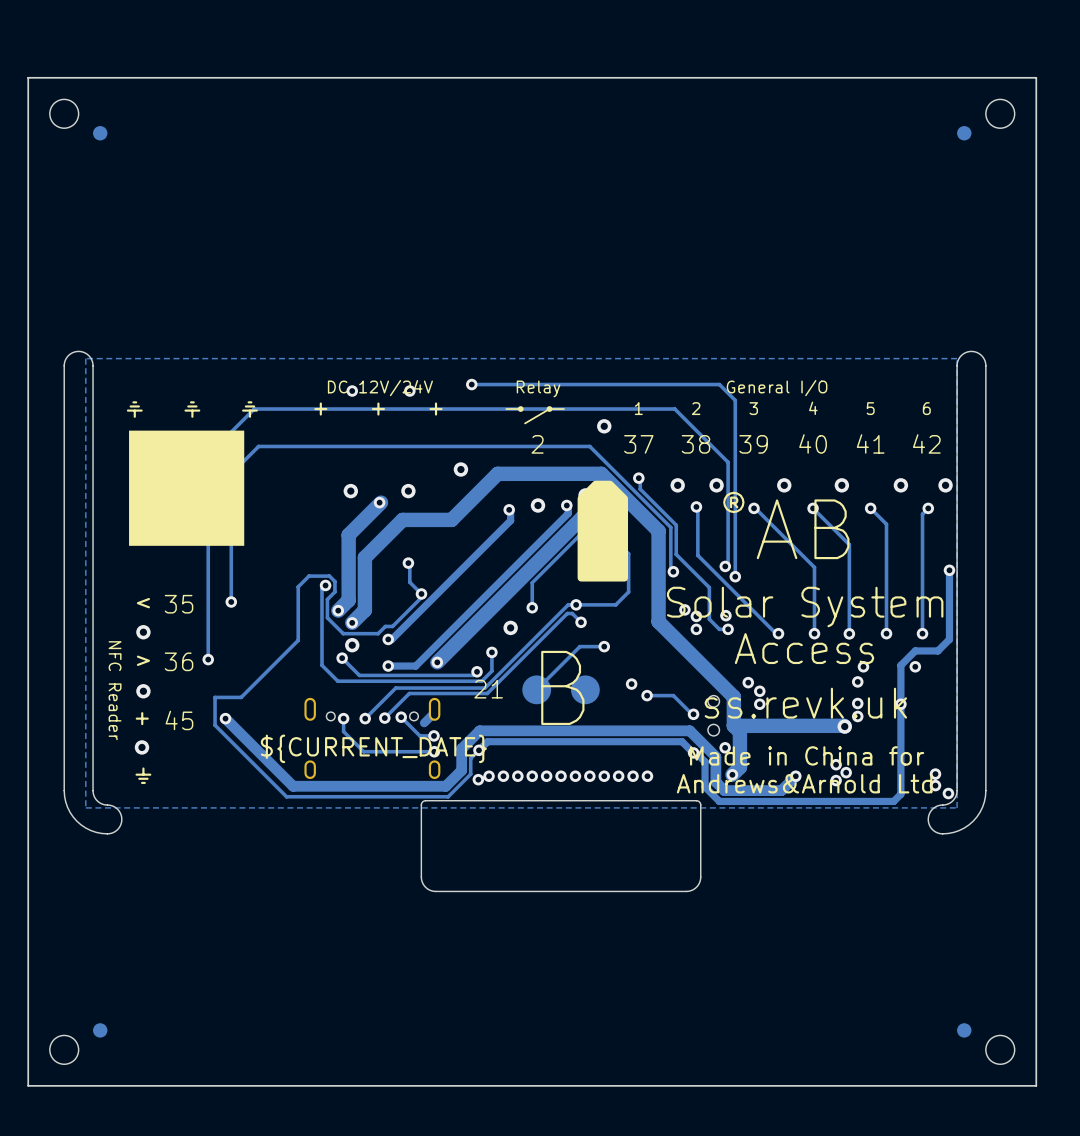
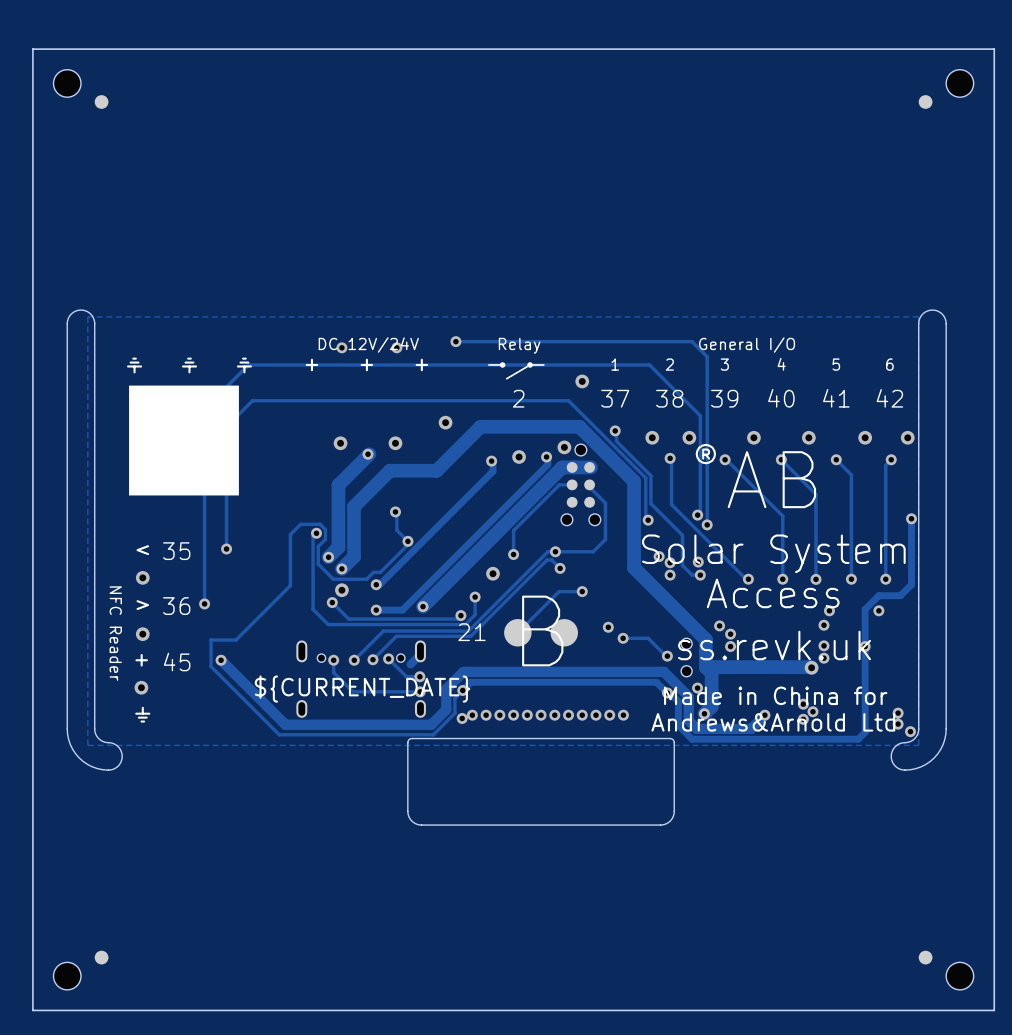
part footprint: [577, 480, 629, 582] -> [561, 444, 601, 526]

